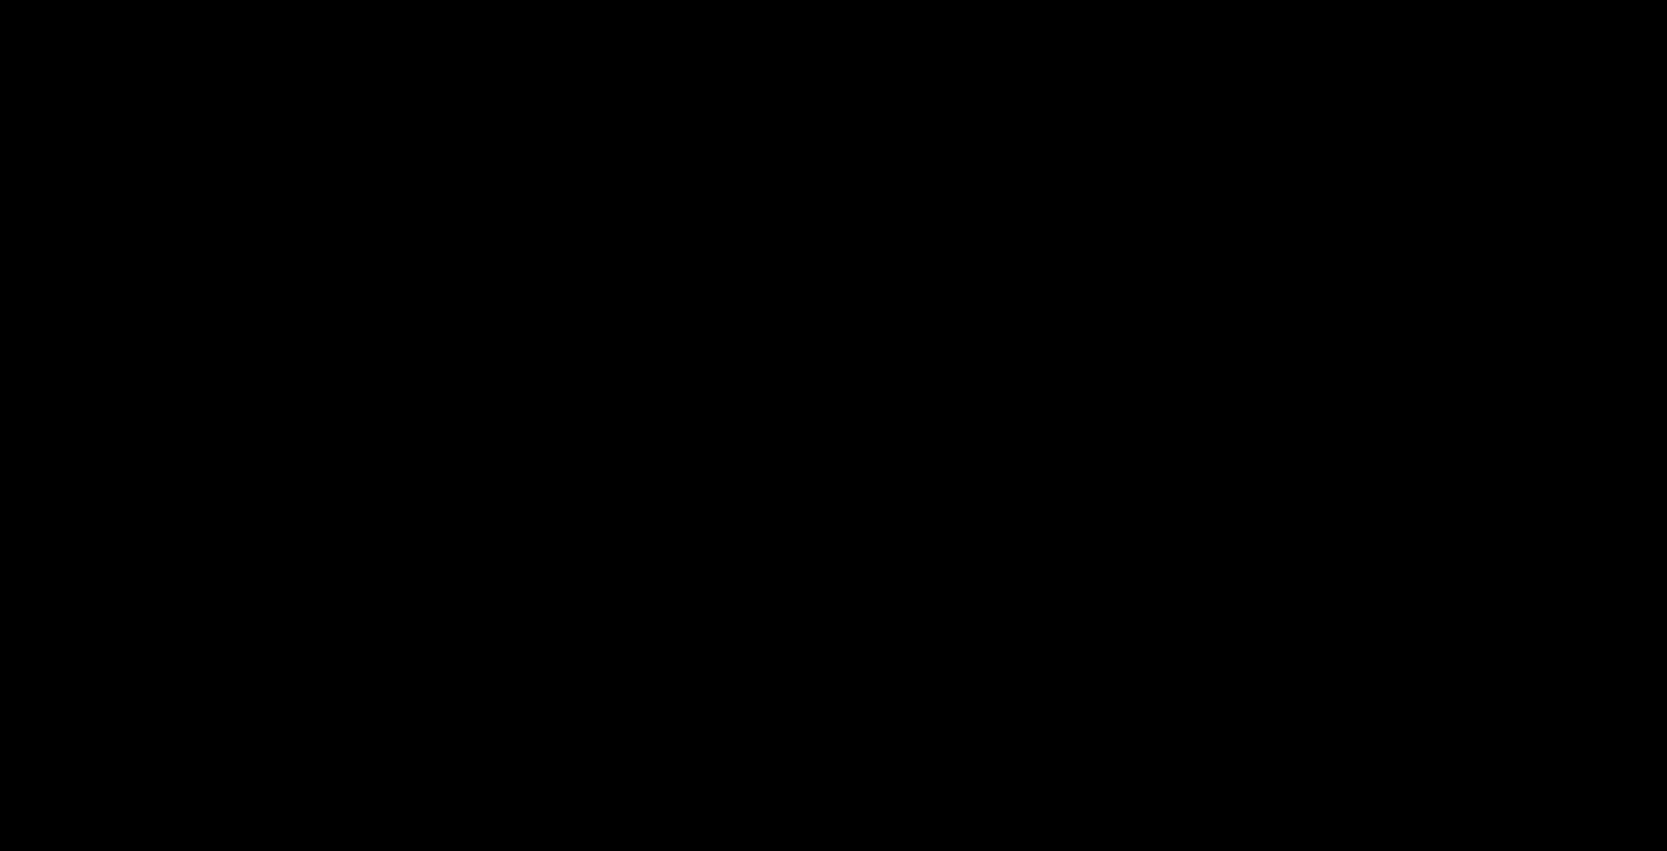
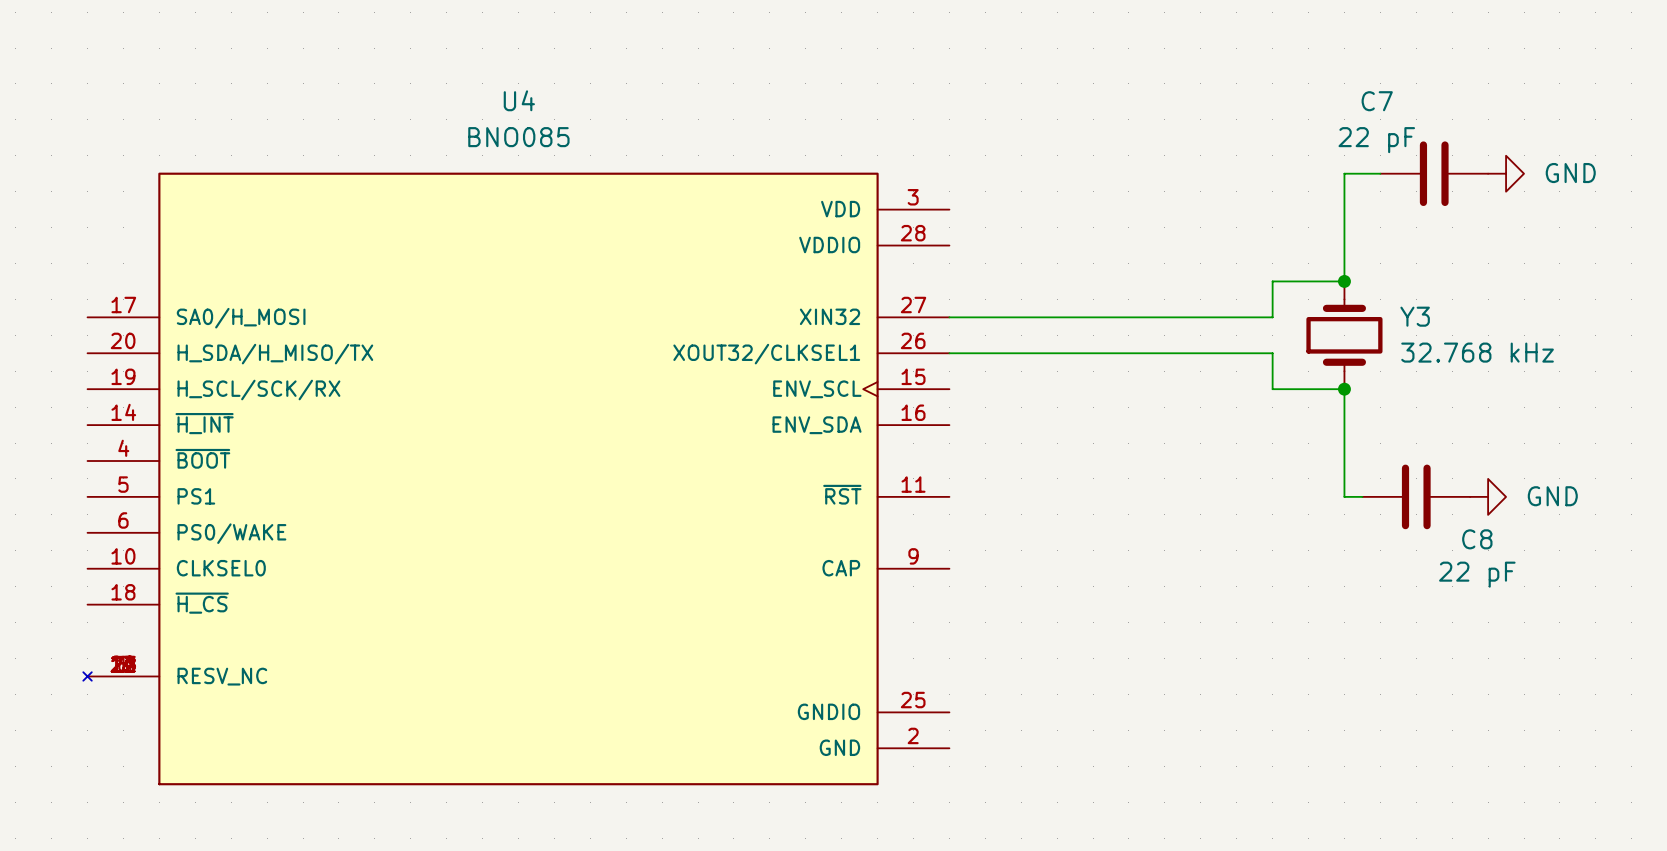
wire: none -> (1380, 173) (1344, 173) (1344, 281) (1272, 281) (1272, 317) (949, 317)
C7: none -> 22 pF (1434, 173)
power symbol: none -> GND (1506, 173)
junction: none -> (1344, 281)
Y3: none -> 32.768 kHz (1344, 335)
wire: none -> (949, 353) (1272, 353) (1272, 389) (1344, 389) (1344, 496) (1362, 496)
junction: none -> (1344, 389)
U4: none -> BNO085 (516, 478)
C8: none -> 22 pF (1416, 496)
power symbol: none -> GND (1488, 496)

